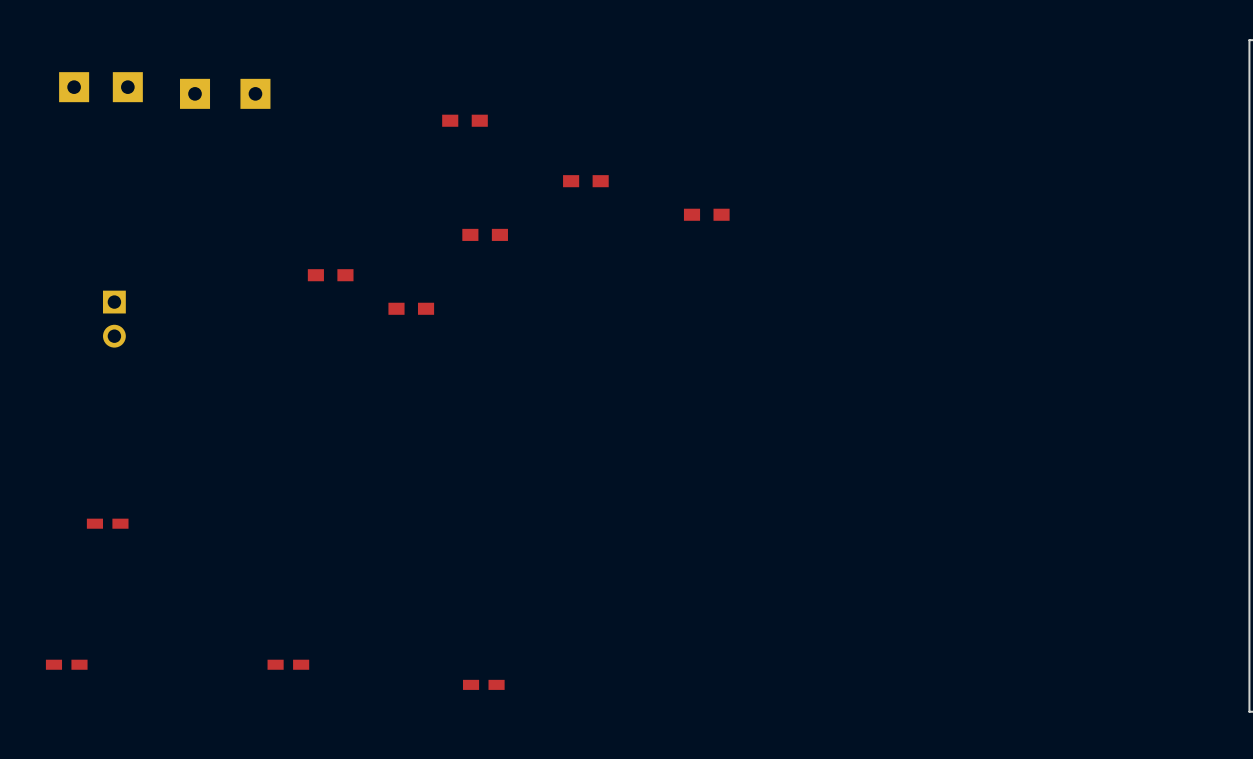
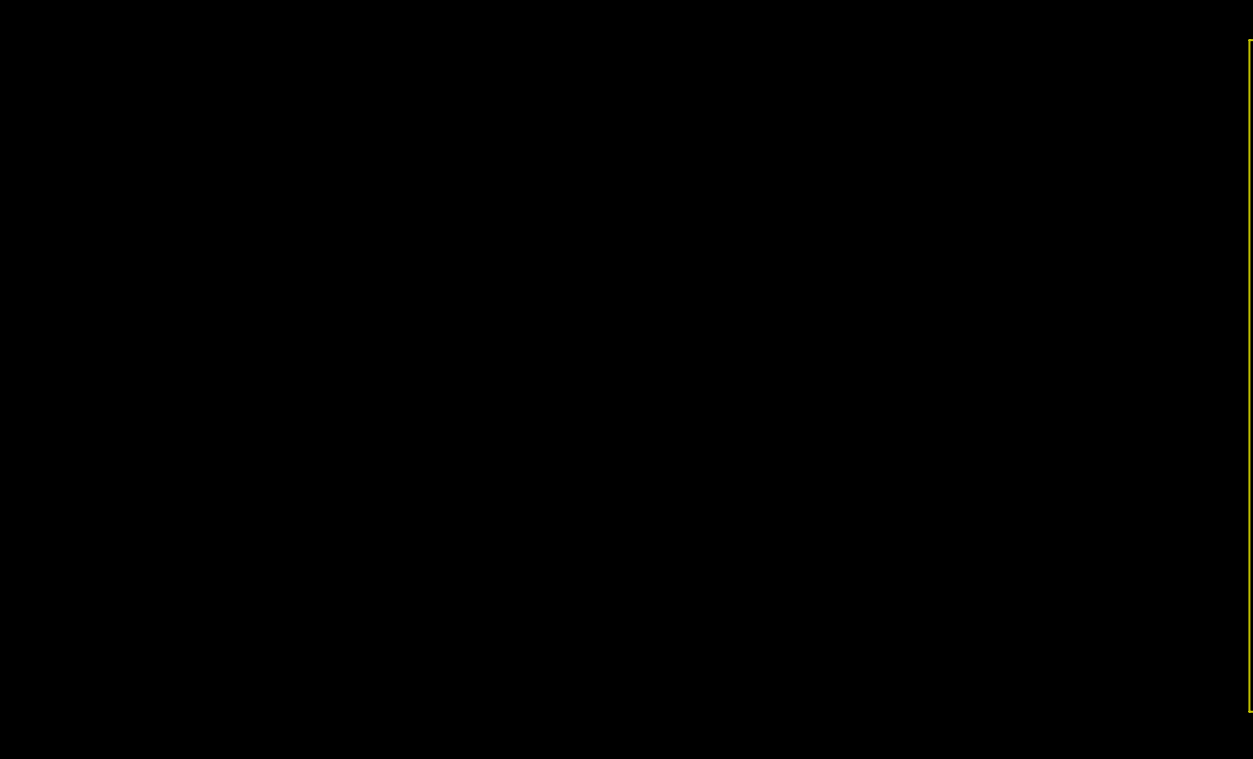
part: (74, 87) -> none
part: (127, 87) -> none
part: (195, 93) -> none
part: (255, 93) -> none
part: (464, 120) -> none
part: (585, 181) -> none
part: (706, 214) -> none
part: (485, 234) -> none
part: (330, 275) -> none
part: (411, 308) -> none
part: (114, 319) -> none
part: (107, 523) -> none
part: (66, 664) -> none
part: (288, 664) -> none
part: (483, 684) -> none

